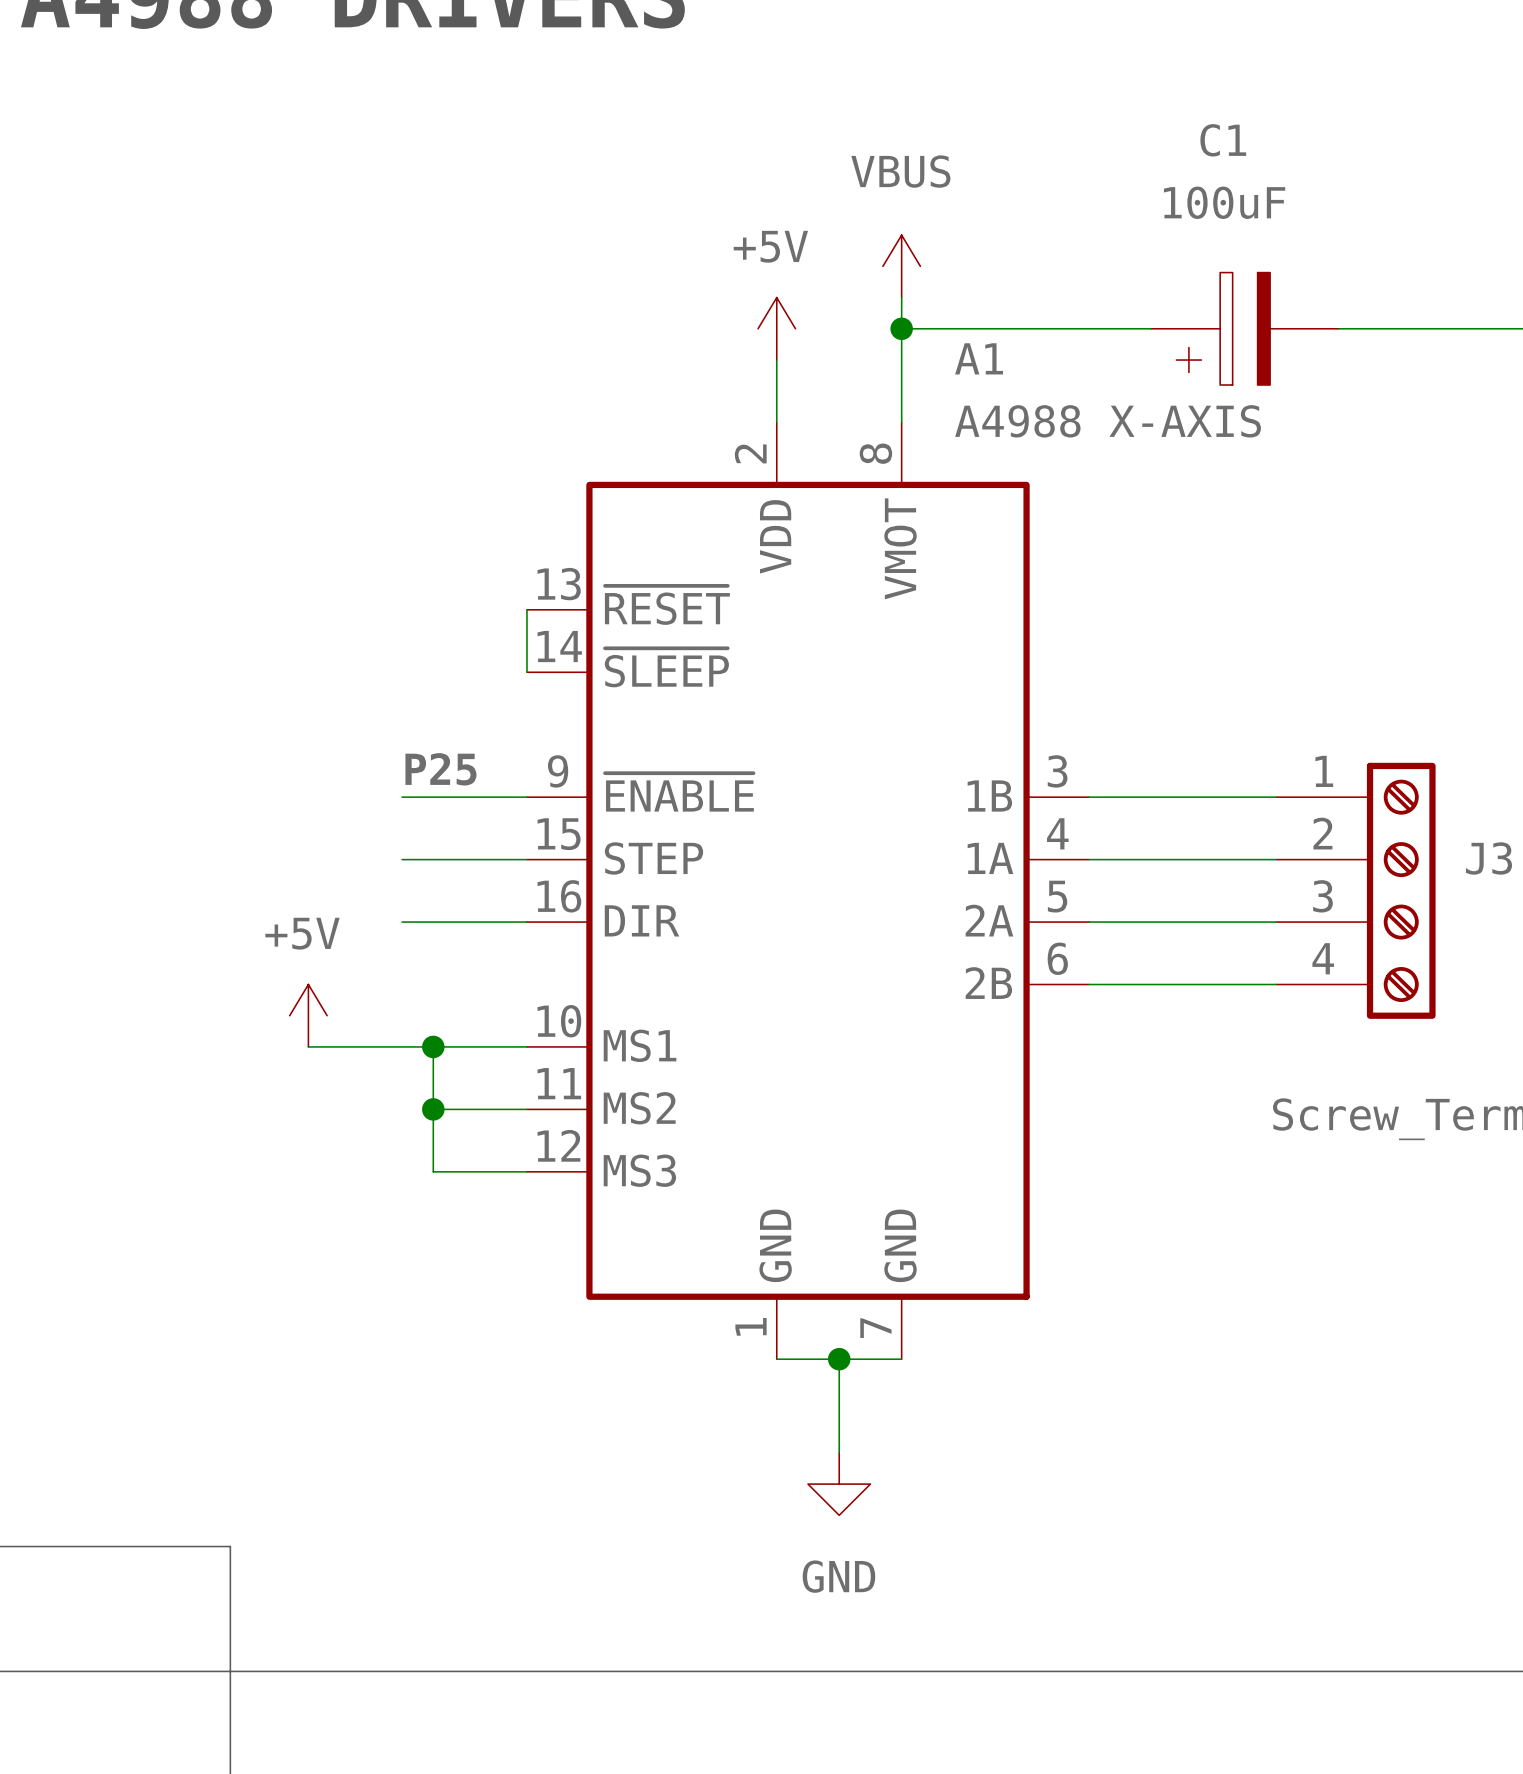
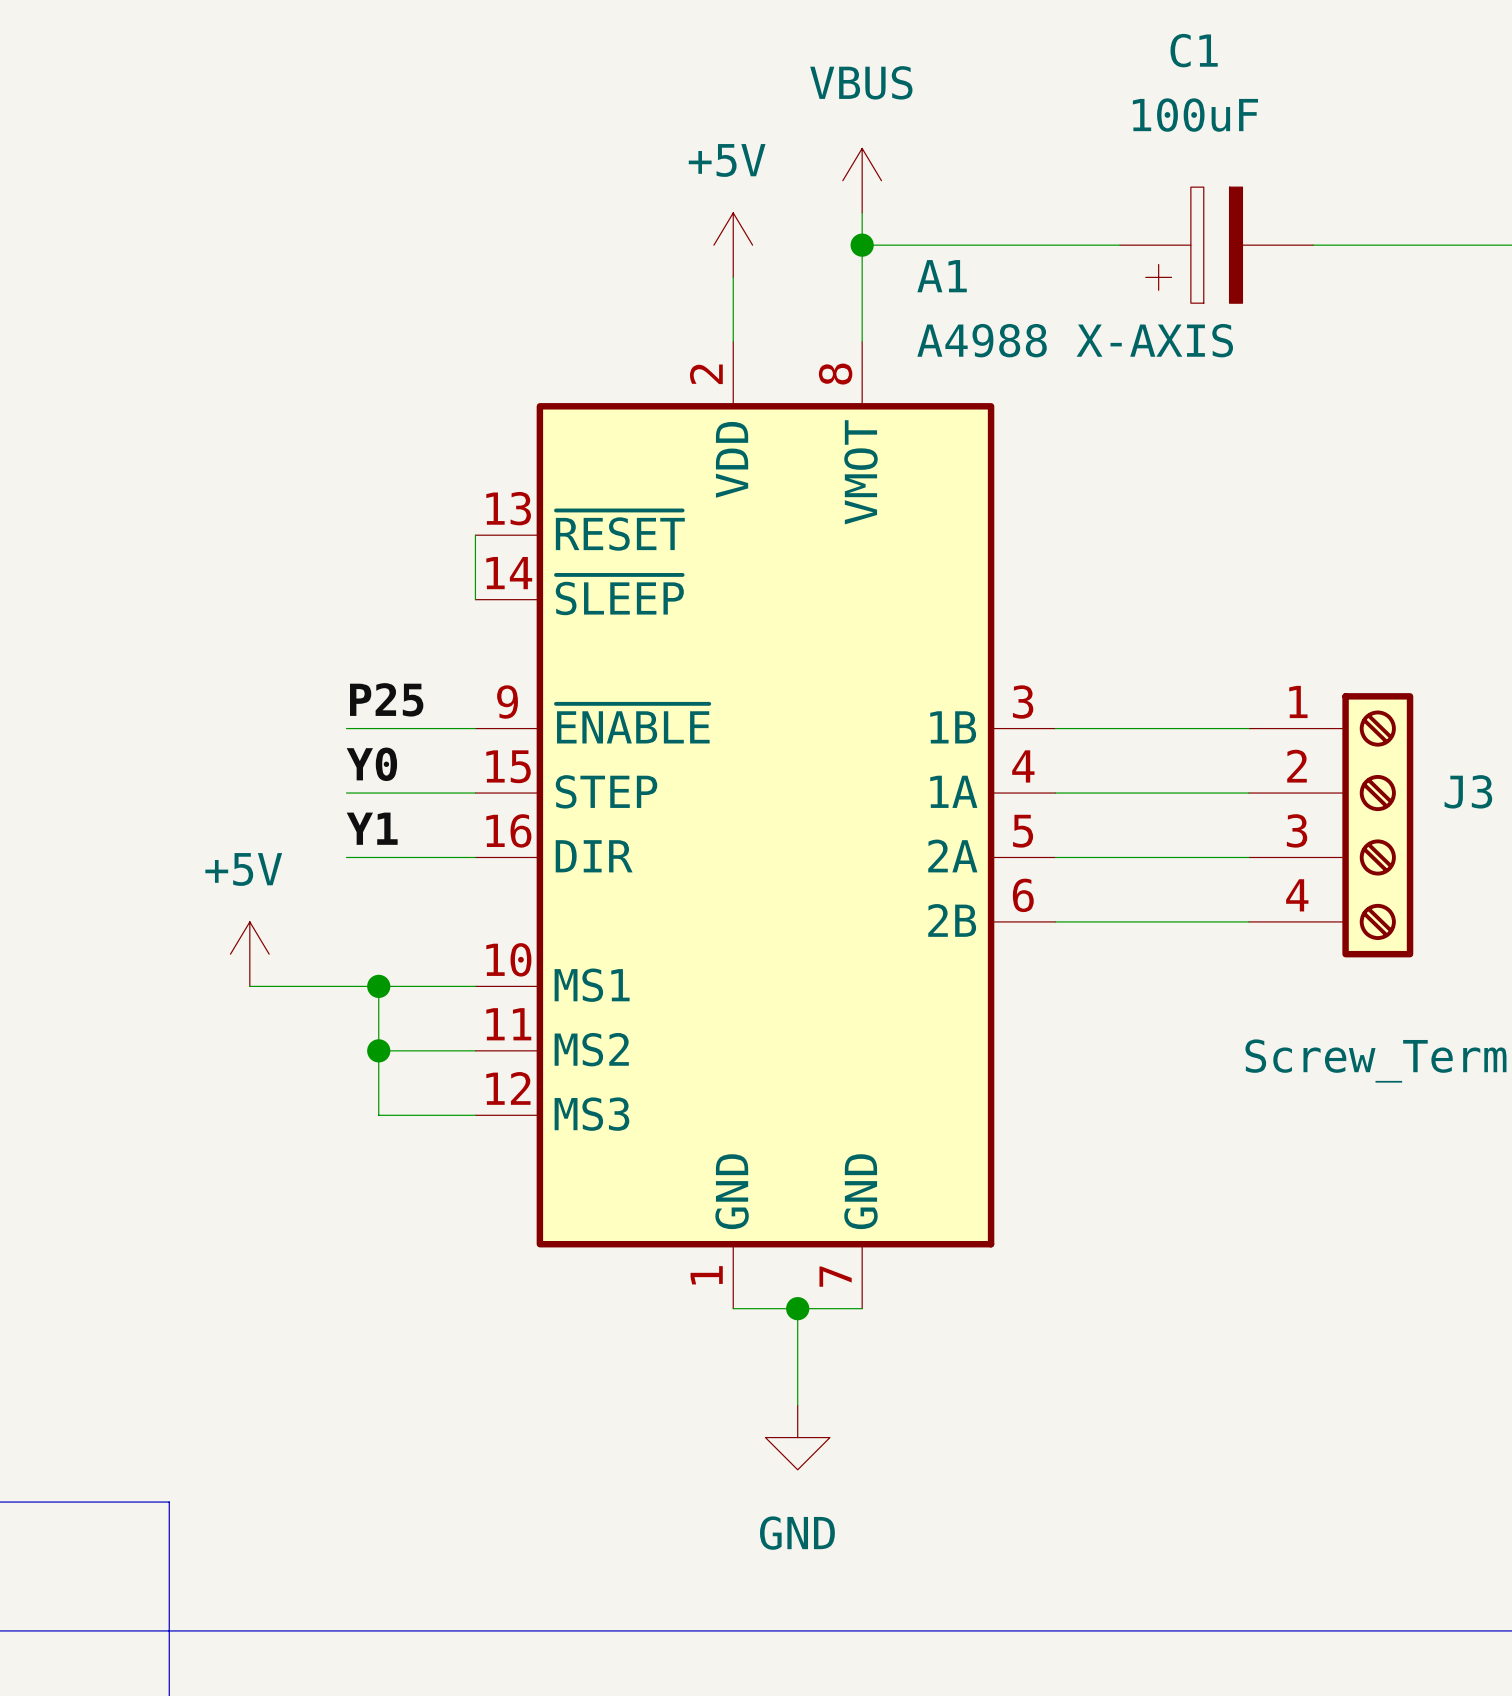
label: none -> Y0 (371, 764)
label: none -> Y1 (372, 828)

